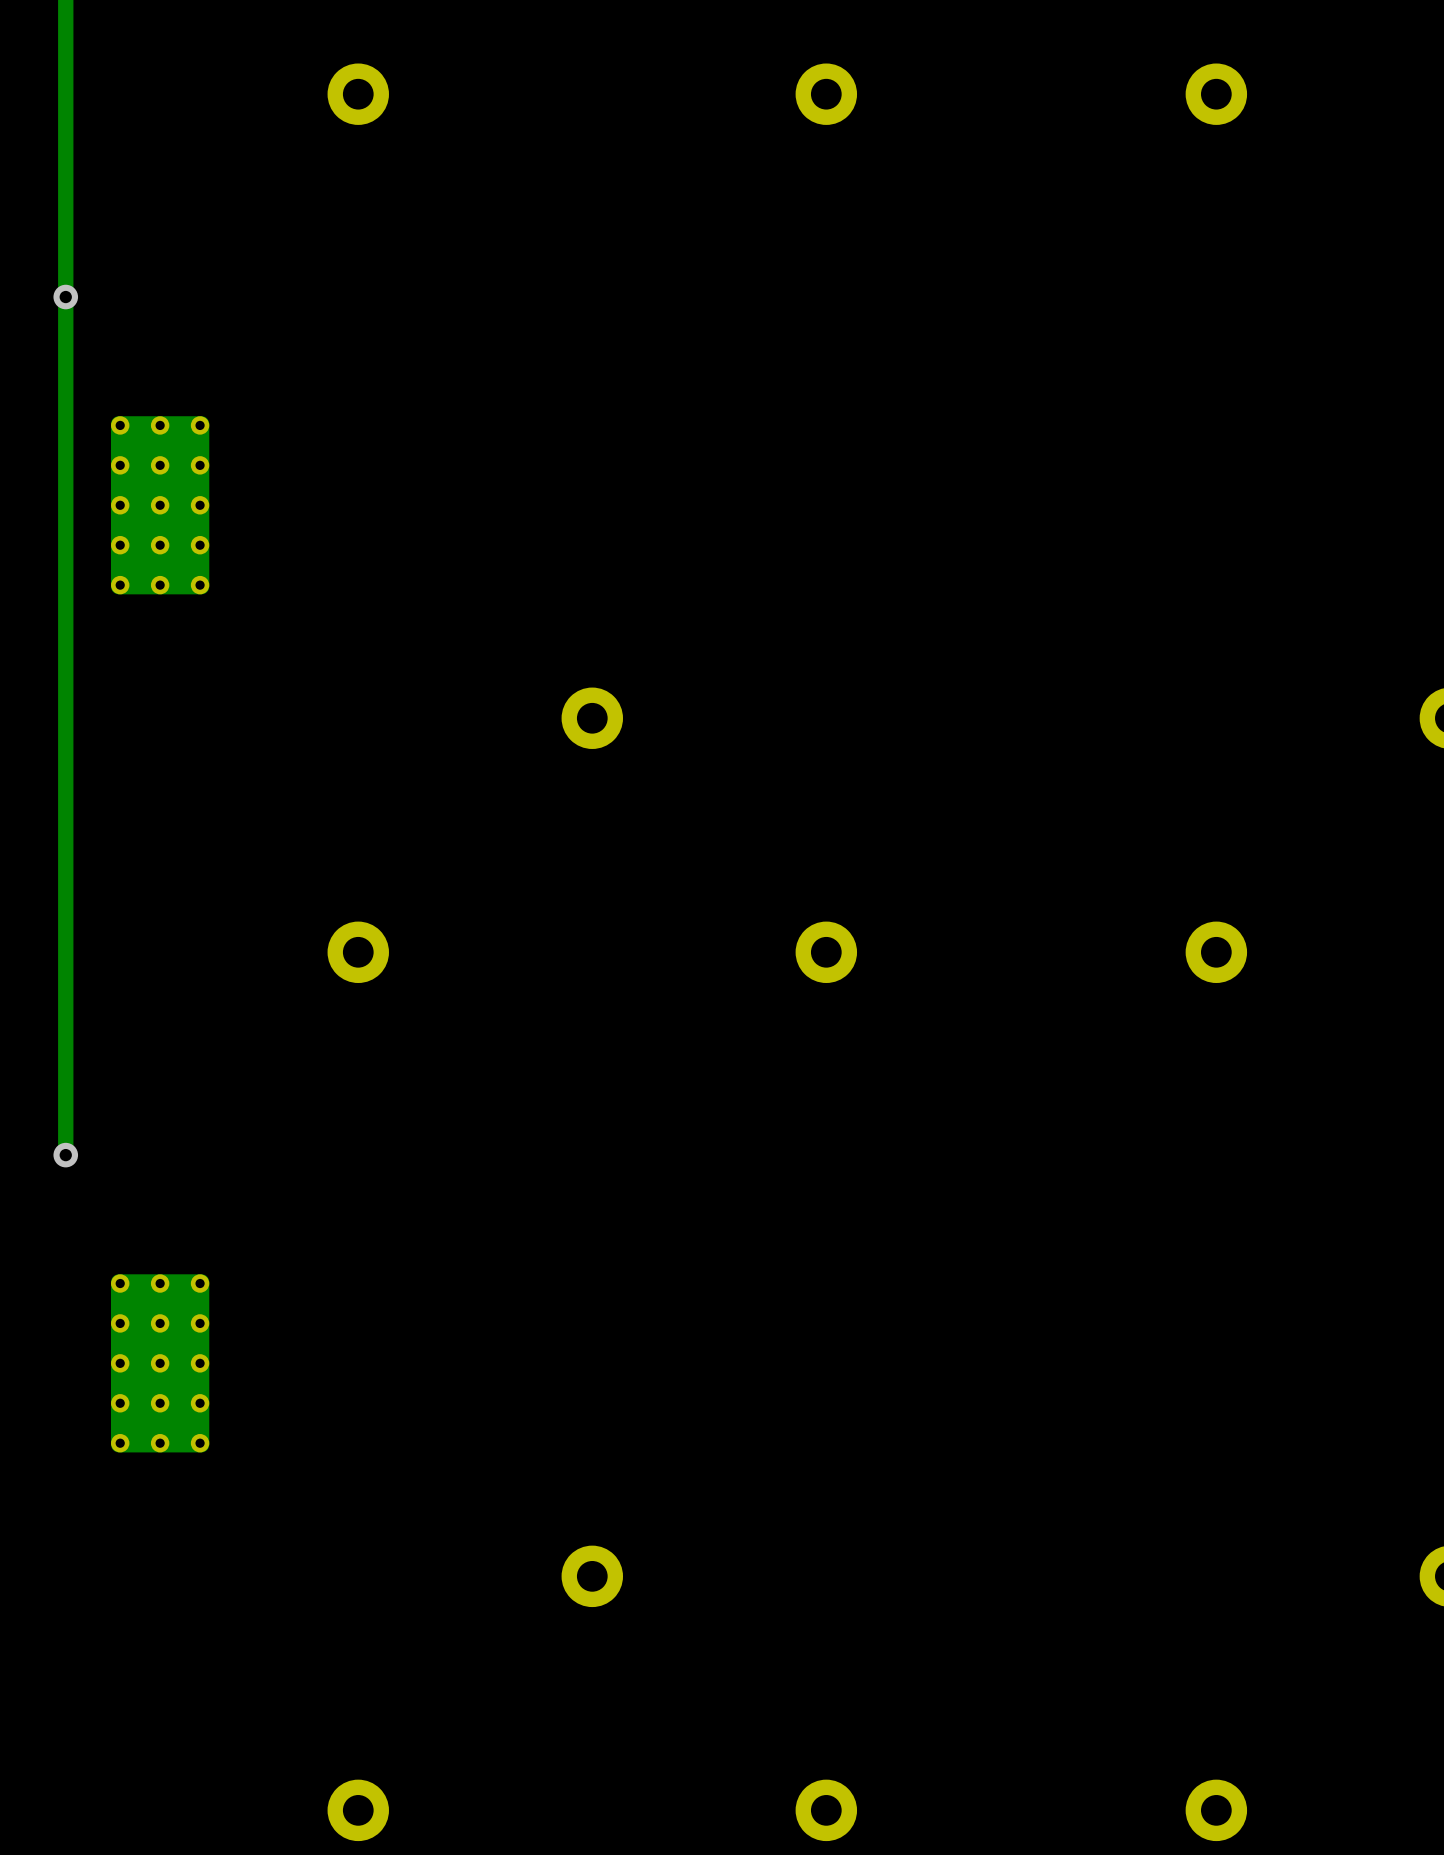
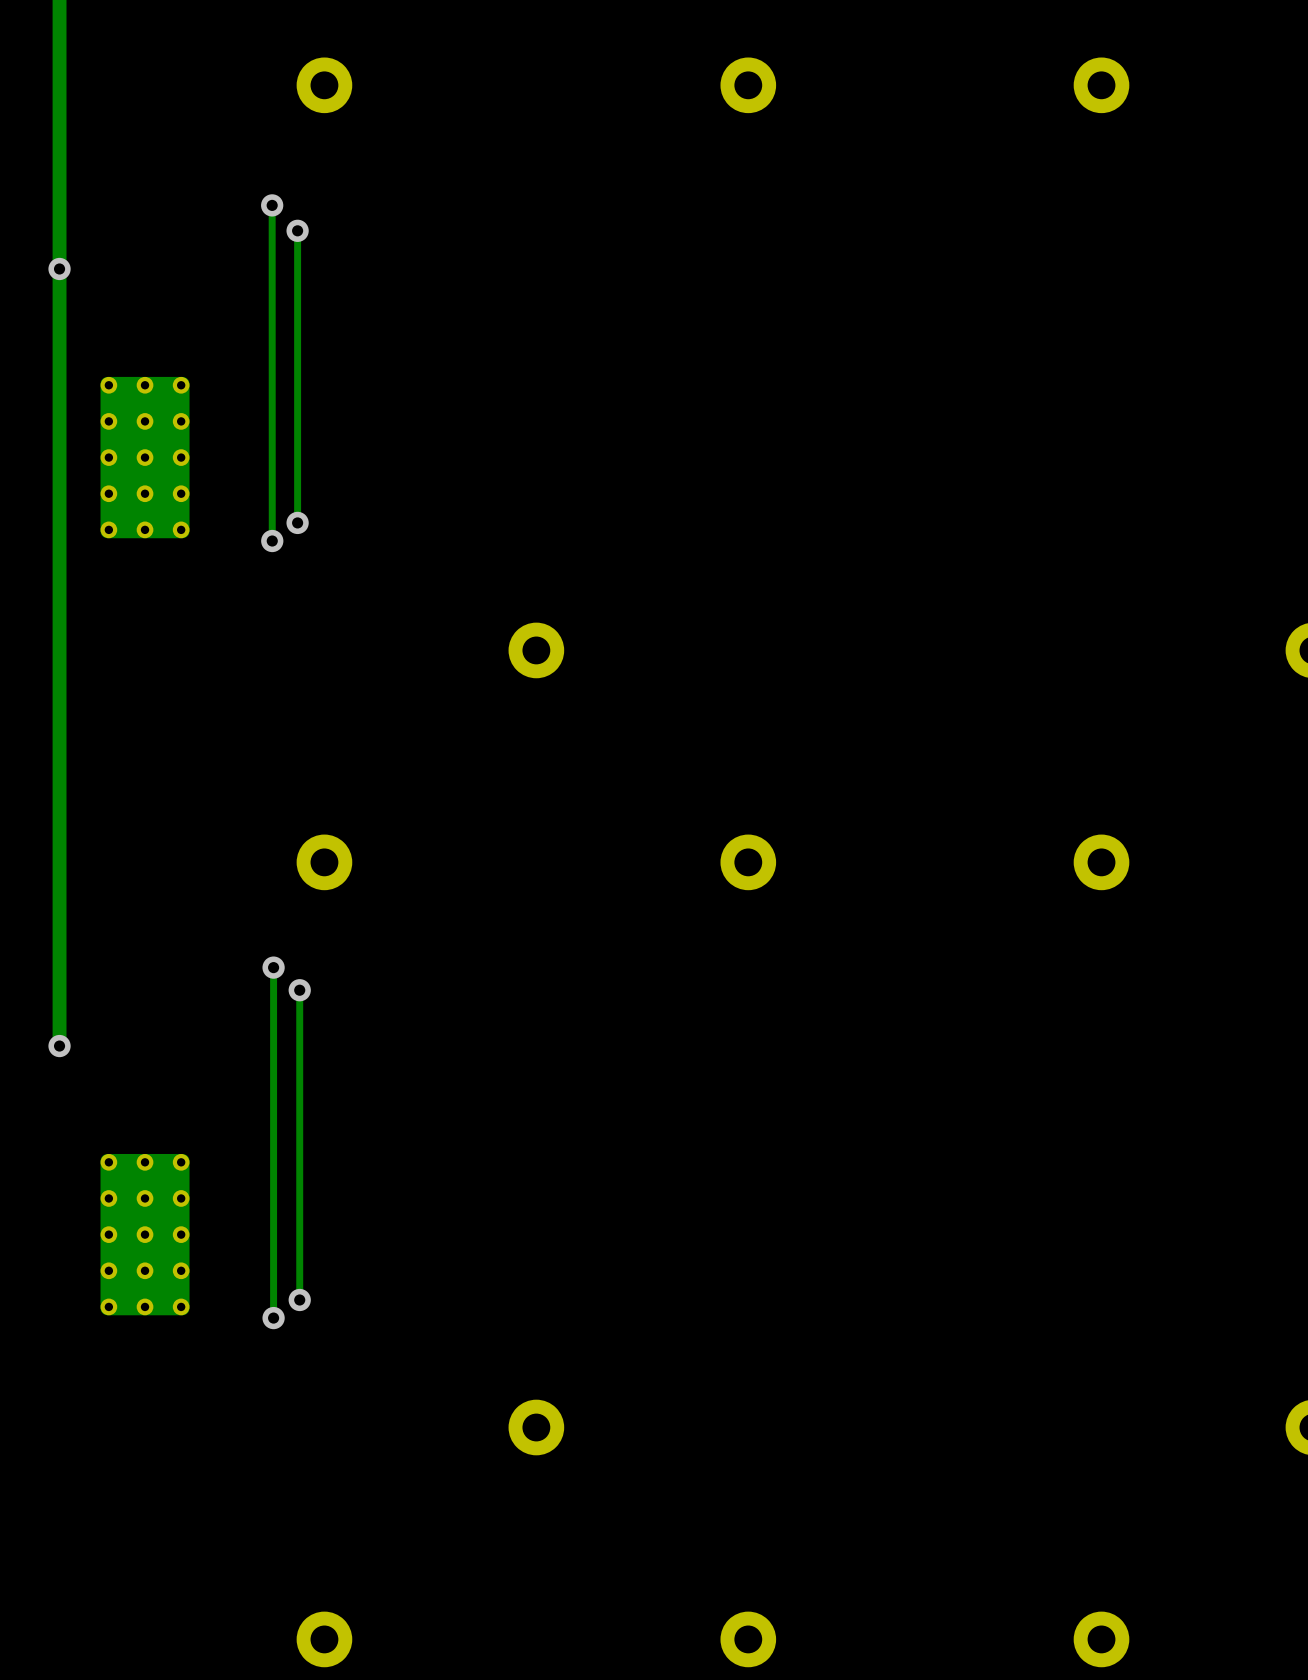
track: none -> (272, 205) (272, 541)
via: none -> (272, 205)
track: none -> (297, 230) (297, 522)
via: none -> (297, 230)
via: none -> (297, 522)
via: none -> (272, 541)
track: none -> (273, 967) (273, 1318)
via: none -> (273, 967)
track: none -> (299, 990) (299, 1299)
via: none -> (299, 990)
via: none -> (299, 1299)
via: none -> (273, 1318)

